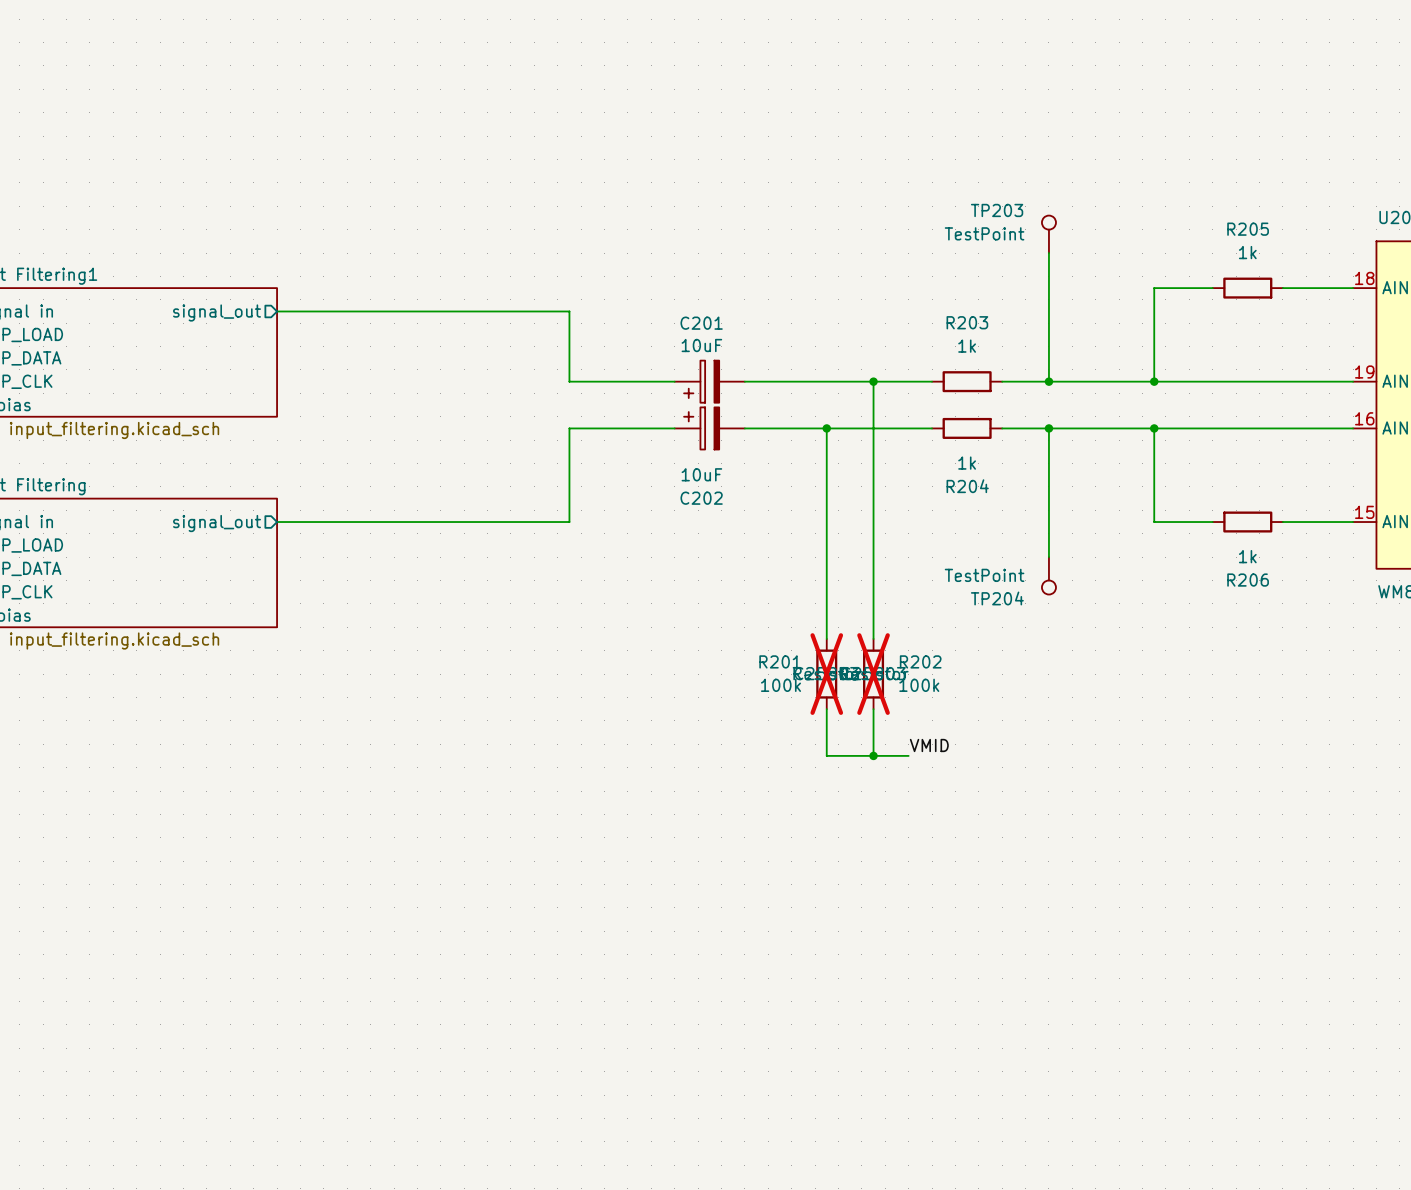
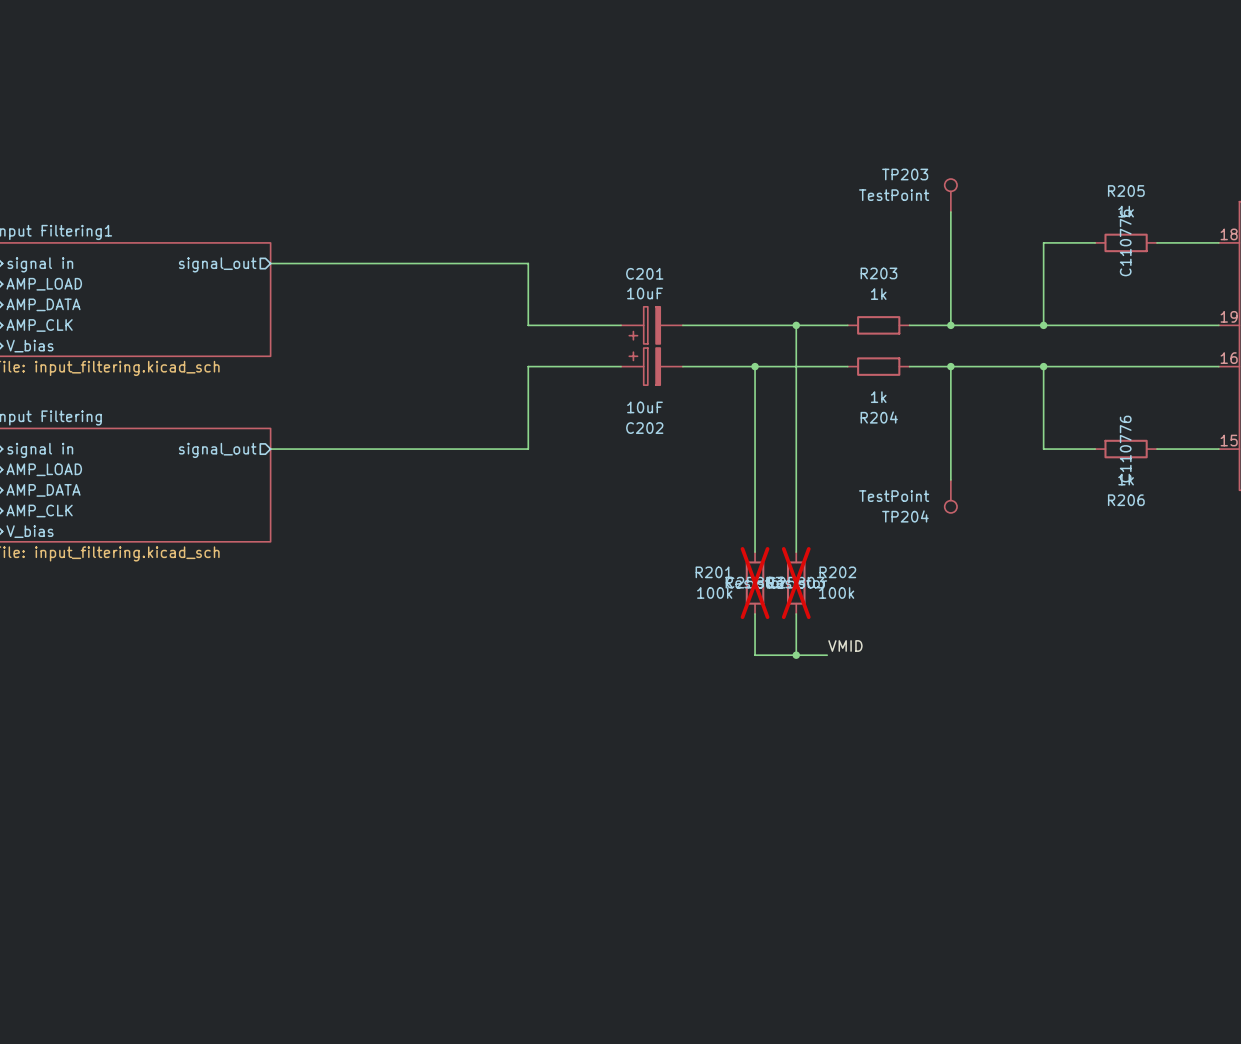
R205 text: none -> C110776 (1125, 242)
R206 text: none -> C110776 (1125, 449)

